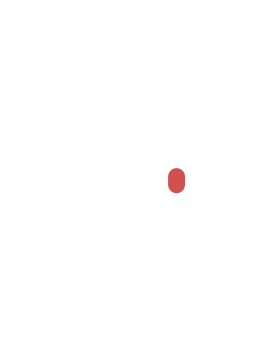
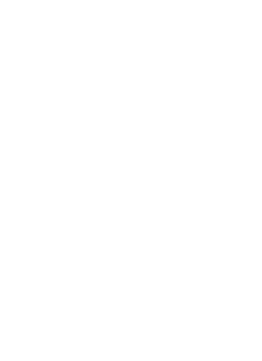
top track: (176, 176) (176, 184) -> none

